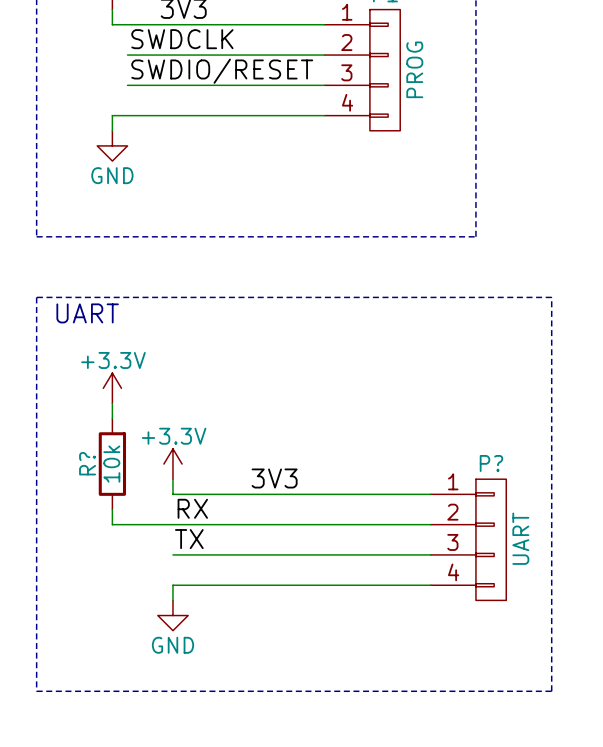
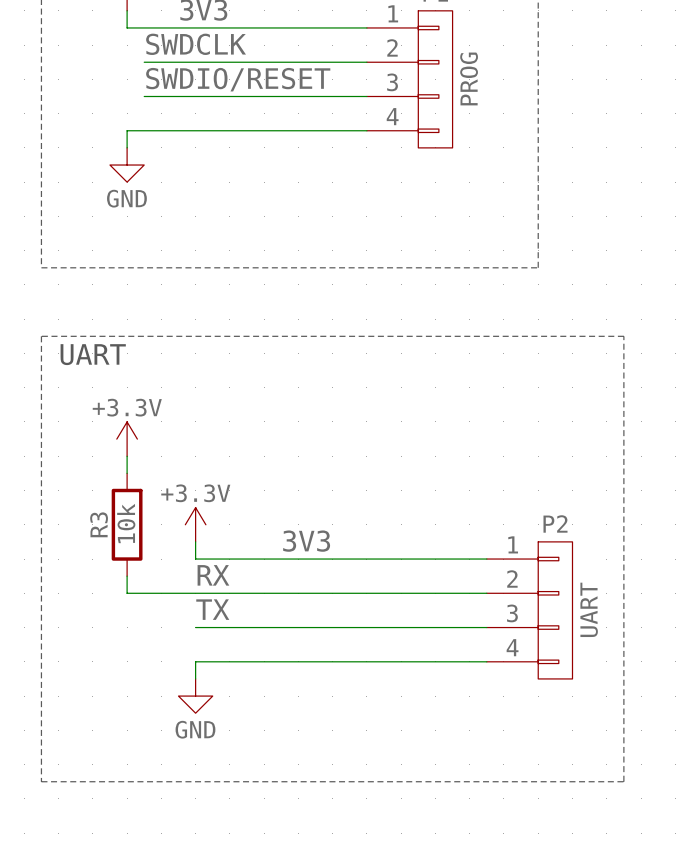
R? name: R? (87, 463) -> R3 (99, 524)
P? name: P? (491, 463) -> P2 (555, 523)

